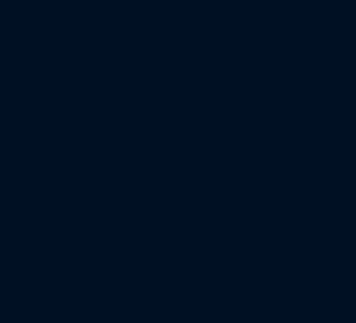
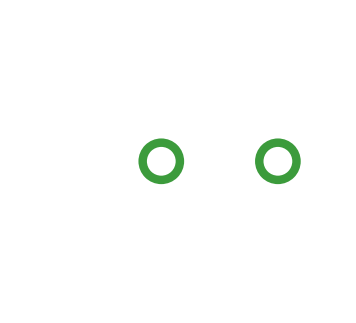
part: none -> (219, 161)

